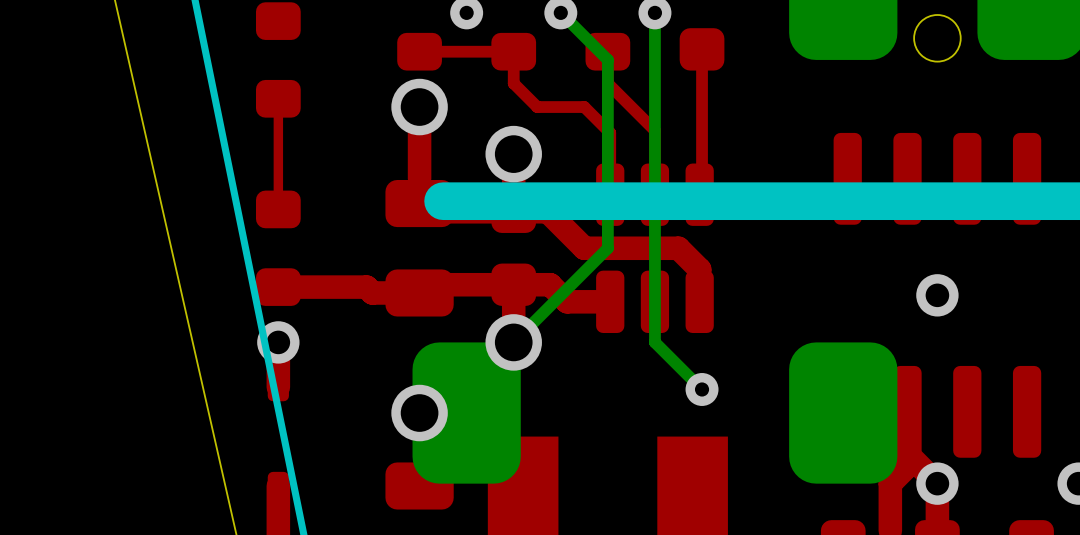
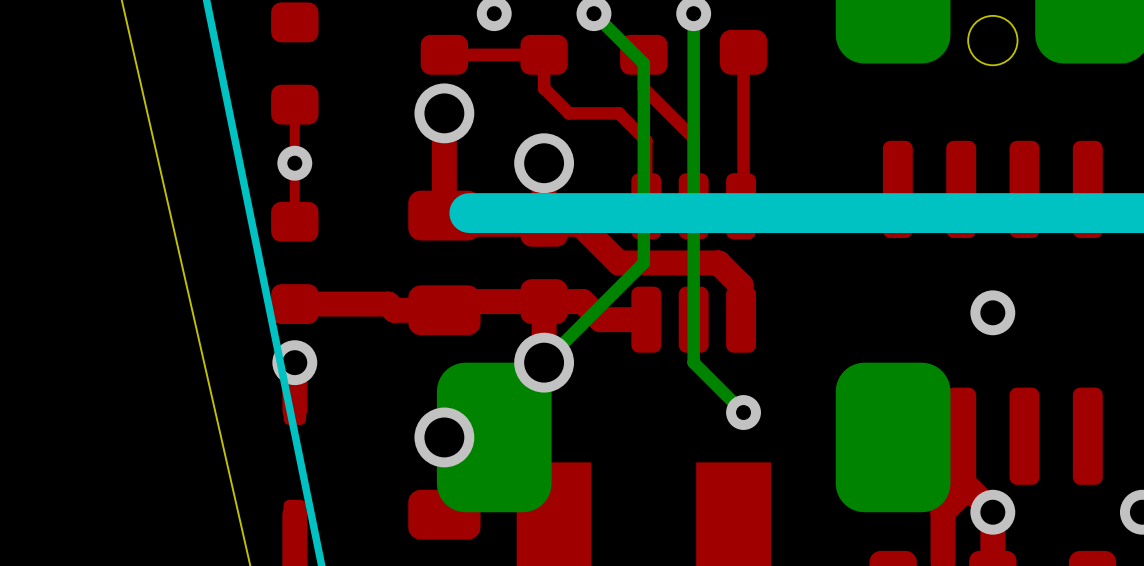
via: none -> (294, 163)

